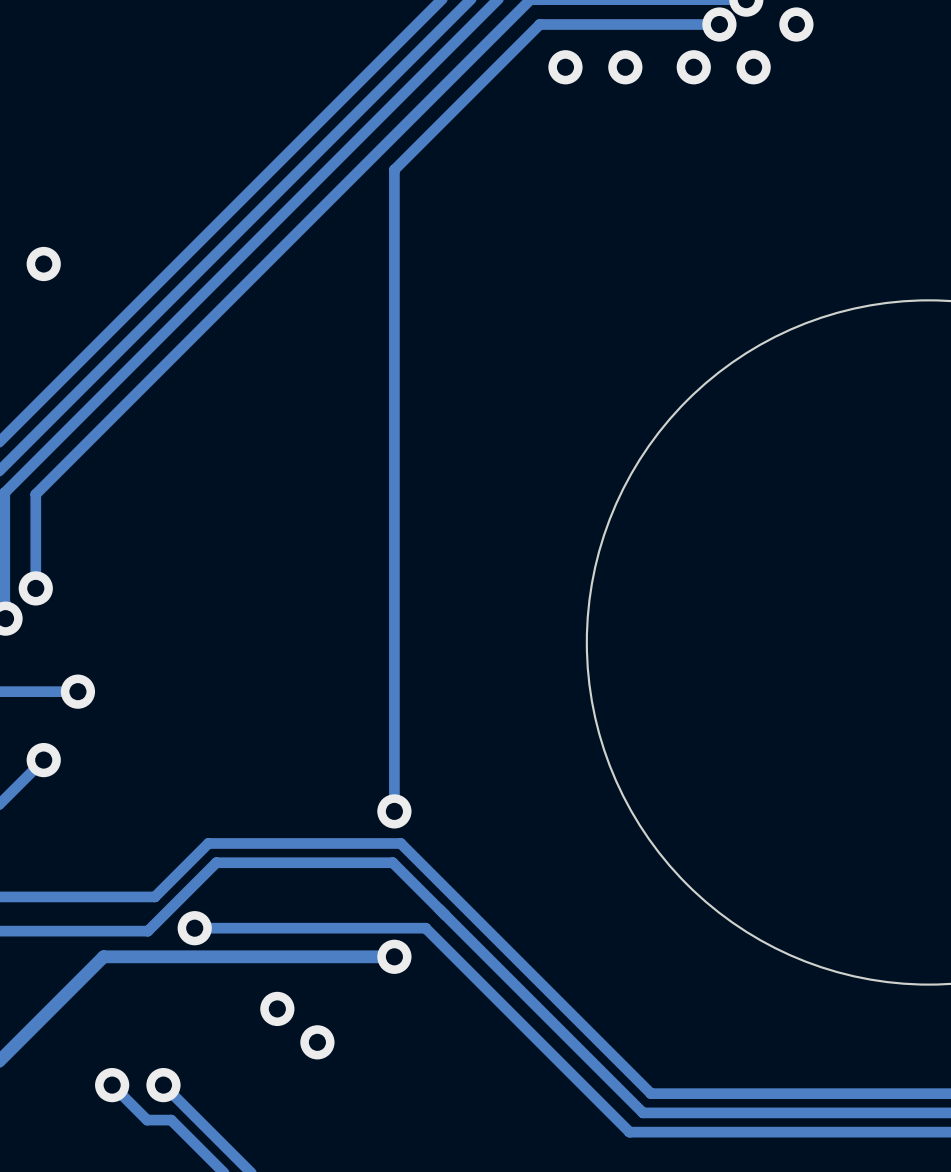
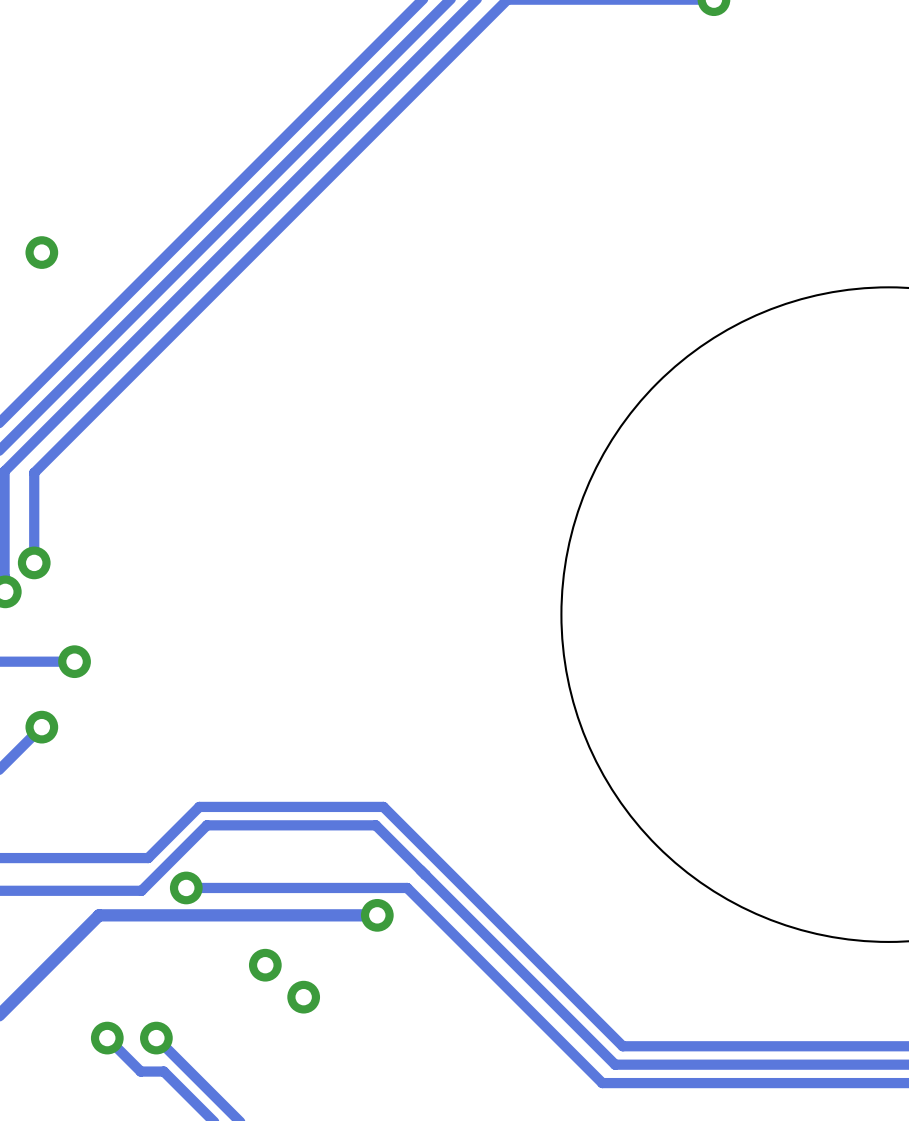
track: (719, 24) (539, 24) (394, 169) (394, 811) -> none
via: (719, 24) -> none
via: (796, 24) -> none
via: (565, 67) -> none
via: (625, 67) -> none
via: (693, 67) -> none
via: (753, 67) -> none
via: (394, 811) -> none

